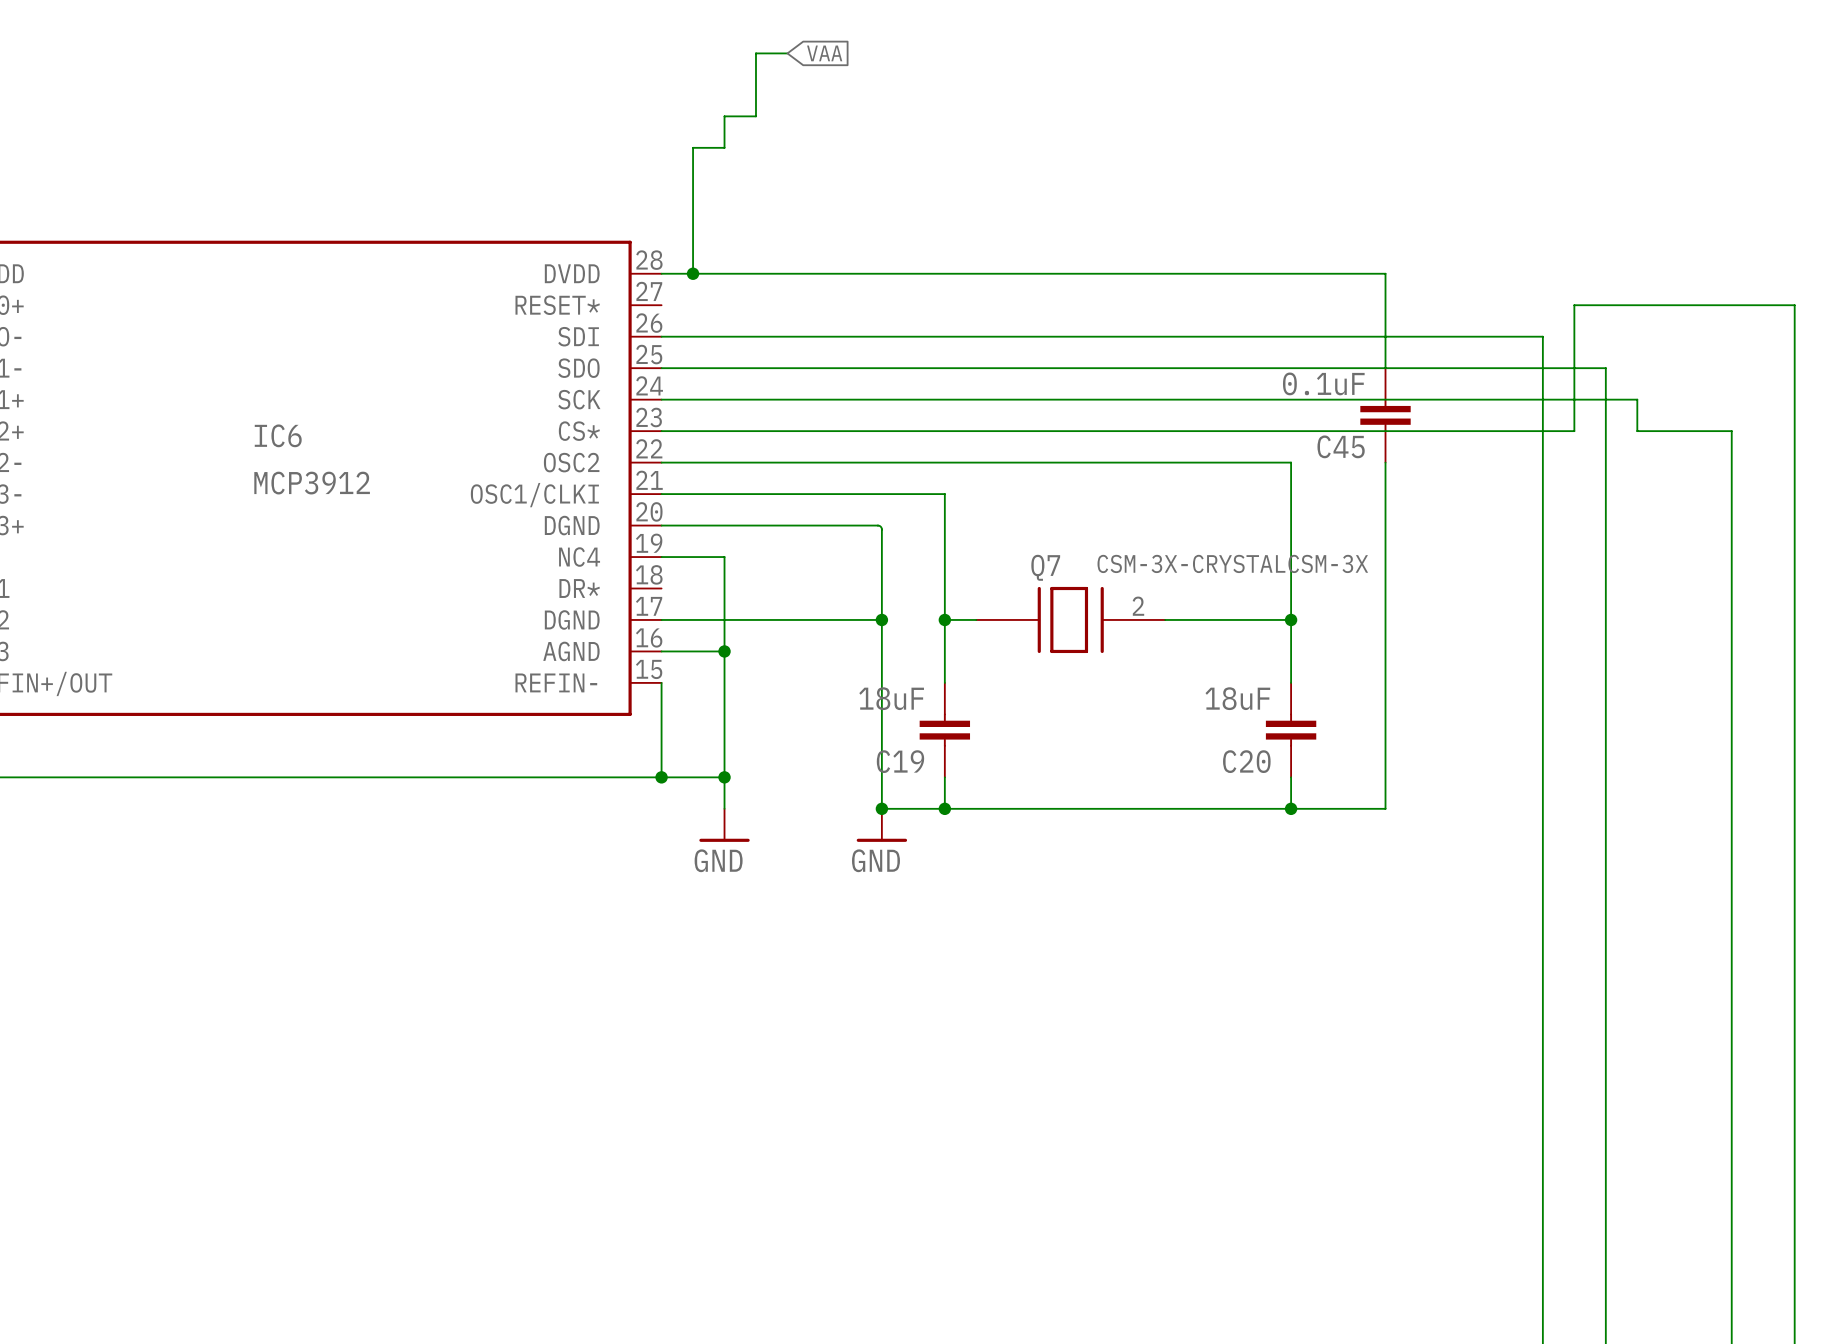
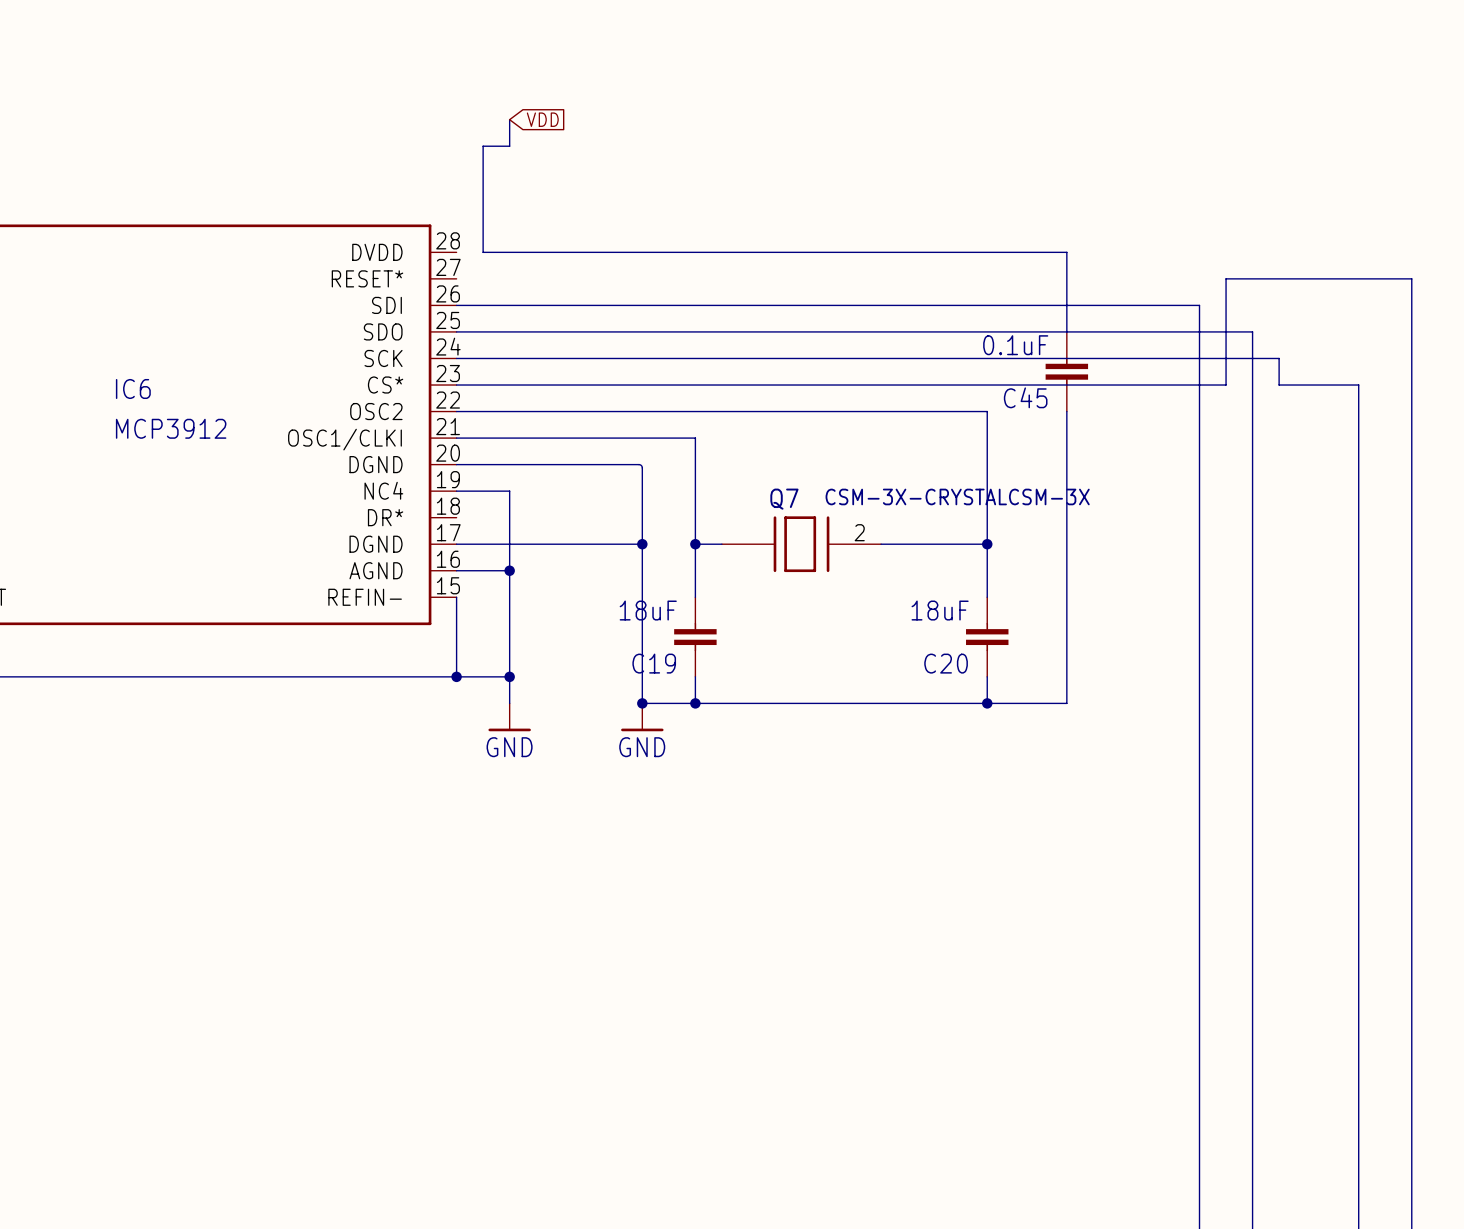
wire: (787, 53) (755, 53) (755, 116) (724, 116) -> none
global label: VAA (824, 53) -> none
global label: none -> VDD (542, 119)
wire: (661, 273) (693, 273) -> none
junction: (693, 273) -> none

